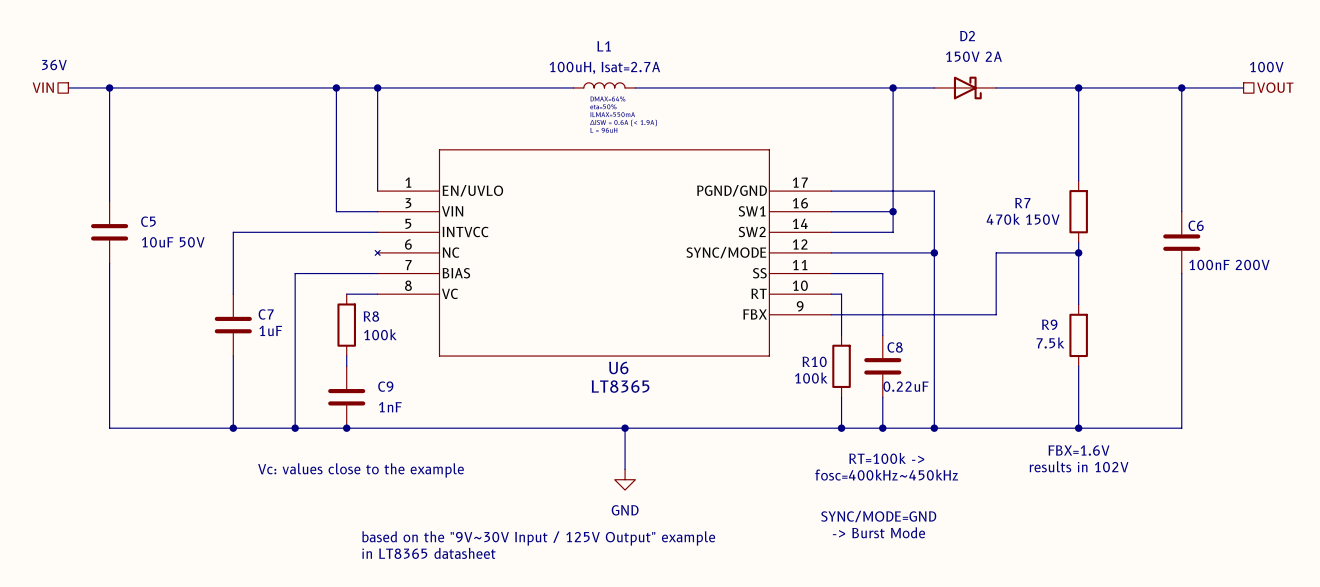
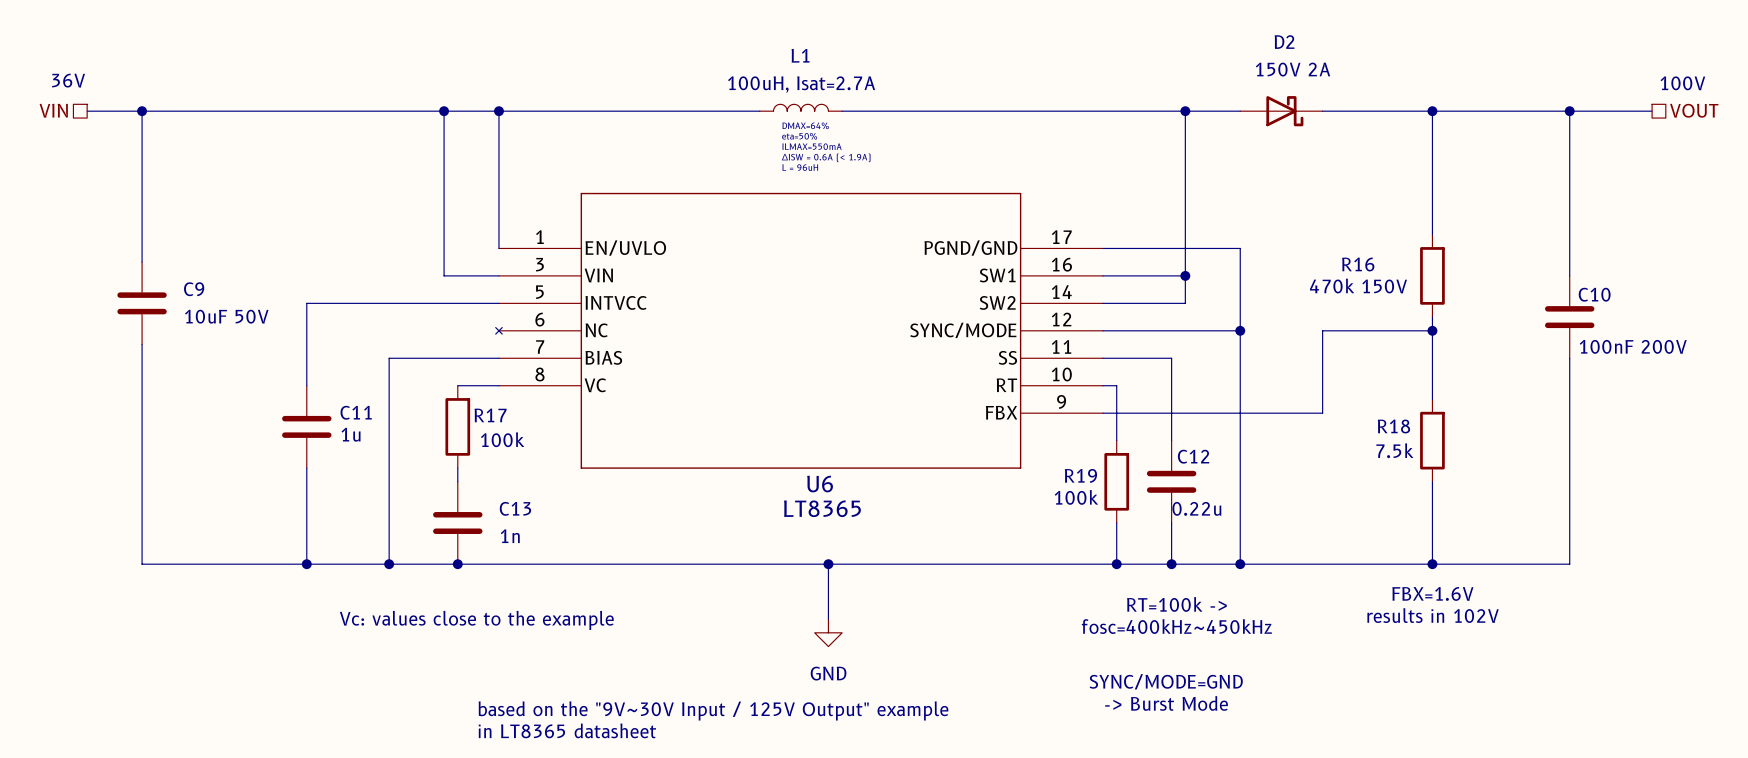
R7 name: R7 (1022, 203) -> R16 (1358, 264)
C5 name: C5 (148, 221) -> C9 (194, 289)
C6 name: C6 (1196, 225) -> C10 (1594, 294)
C7 name: C7 (266, 314) -> C11 (356, 412)
R8 name: R8 (371, 316) -> R17 (490, 415)
R9 name: R9 (1049, 324) -> R18 (1393, 426)
C7 value: 1uF (270, 330) -> 1u (351, 434)
C8 name: C8 (895, 347) -> C12 (1193, 456)
R10 name: R10 (814, 361) -> R19 (1080, 475)
C9 name: C9 (385, 386) -> C13 (515, 508)
C8 value: 0.22uF (905, 386) -> 0.22u (1196, 508)
C9 value: 1nF (390, 407) -> 1n (510, 536)

